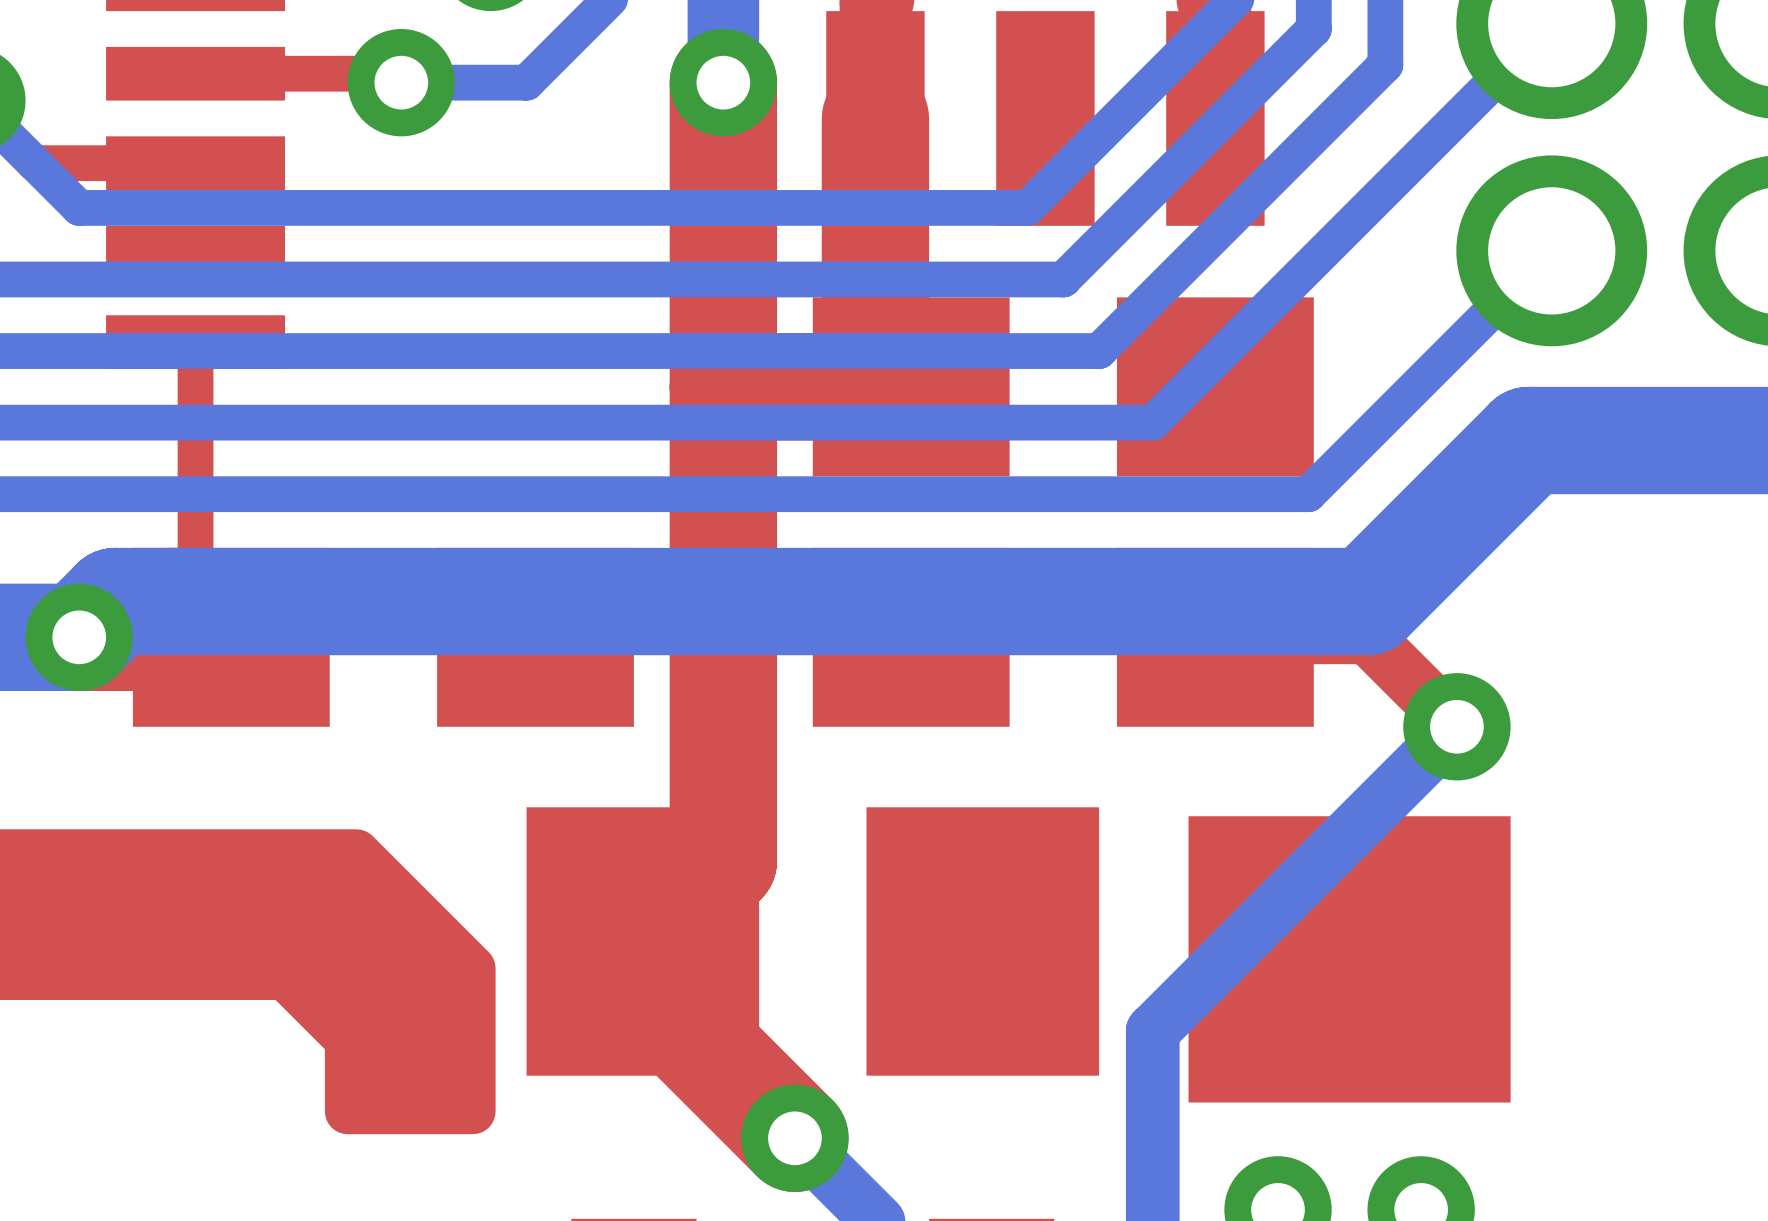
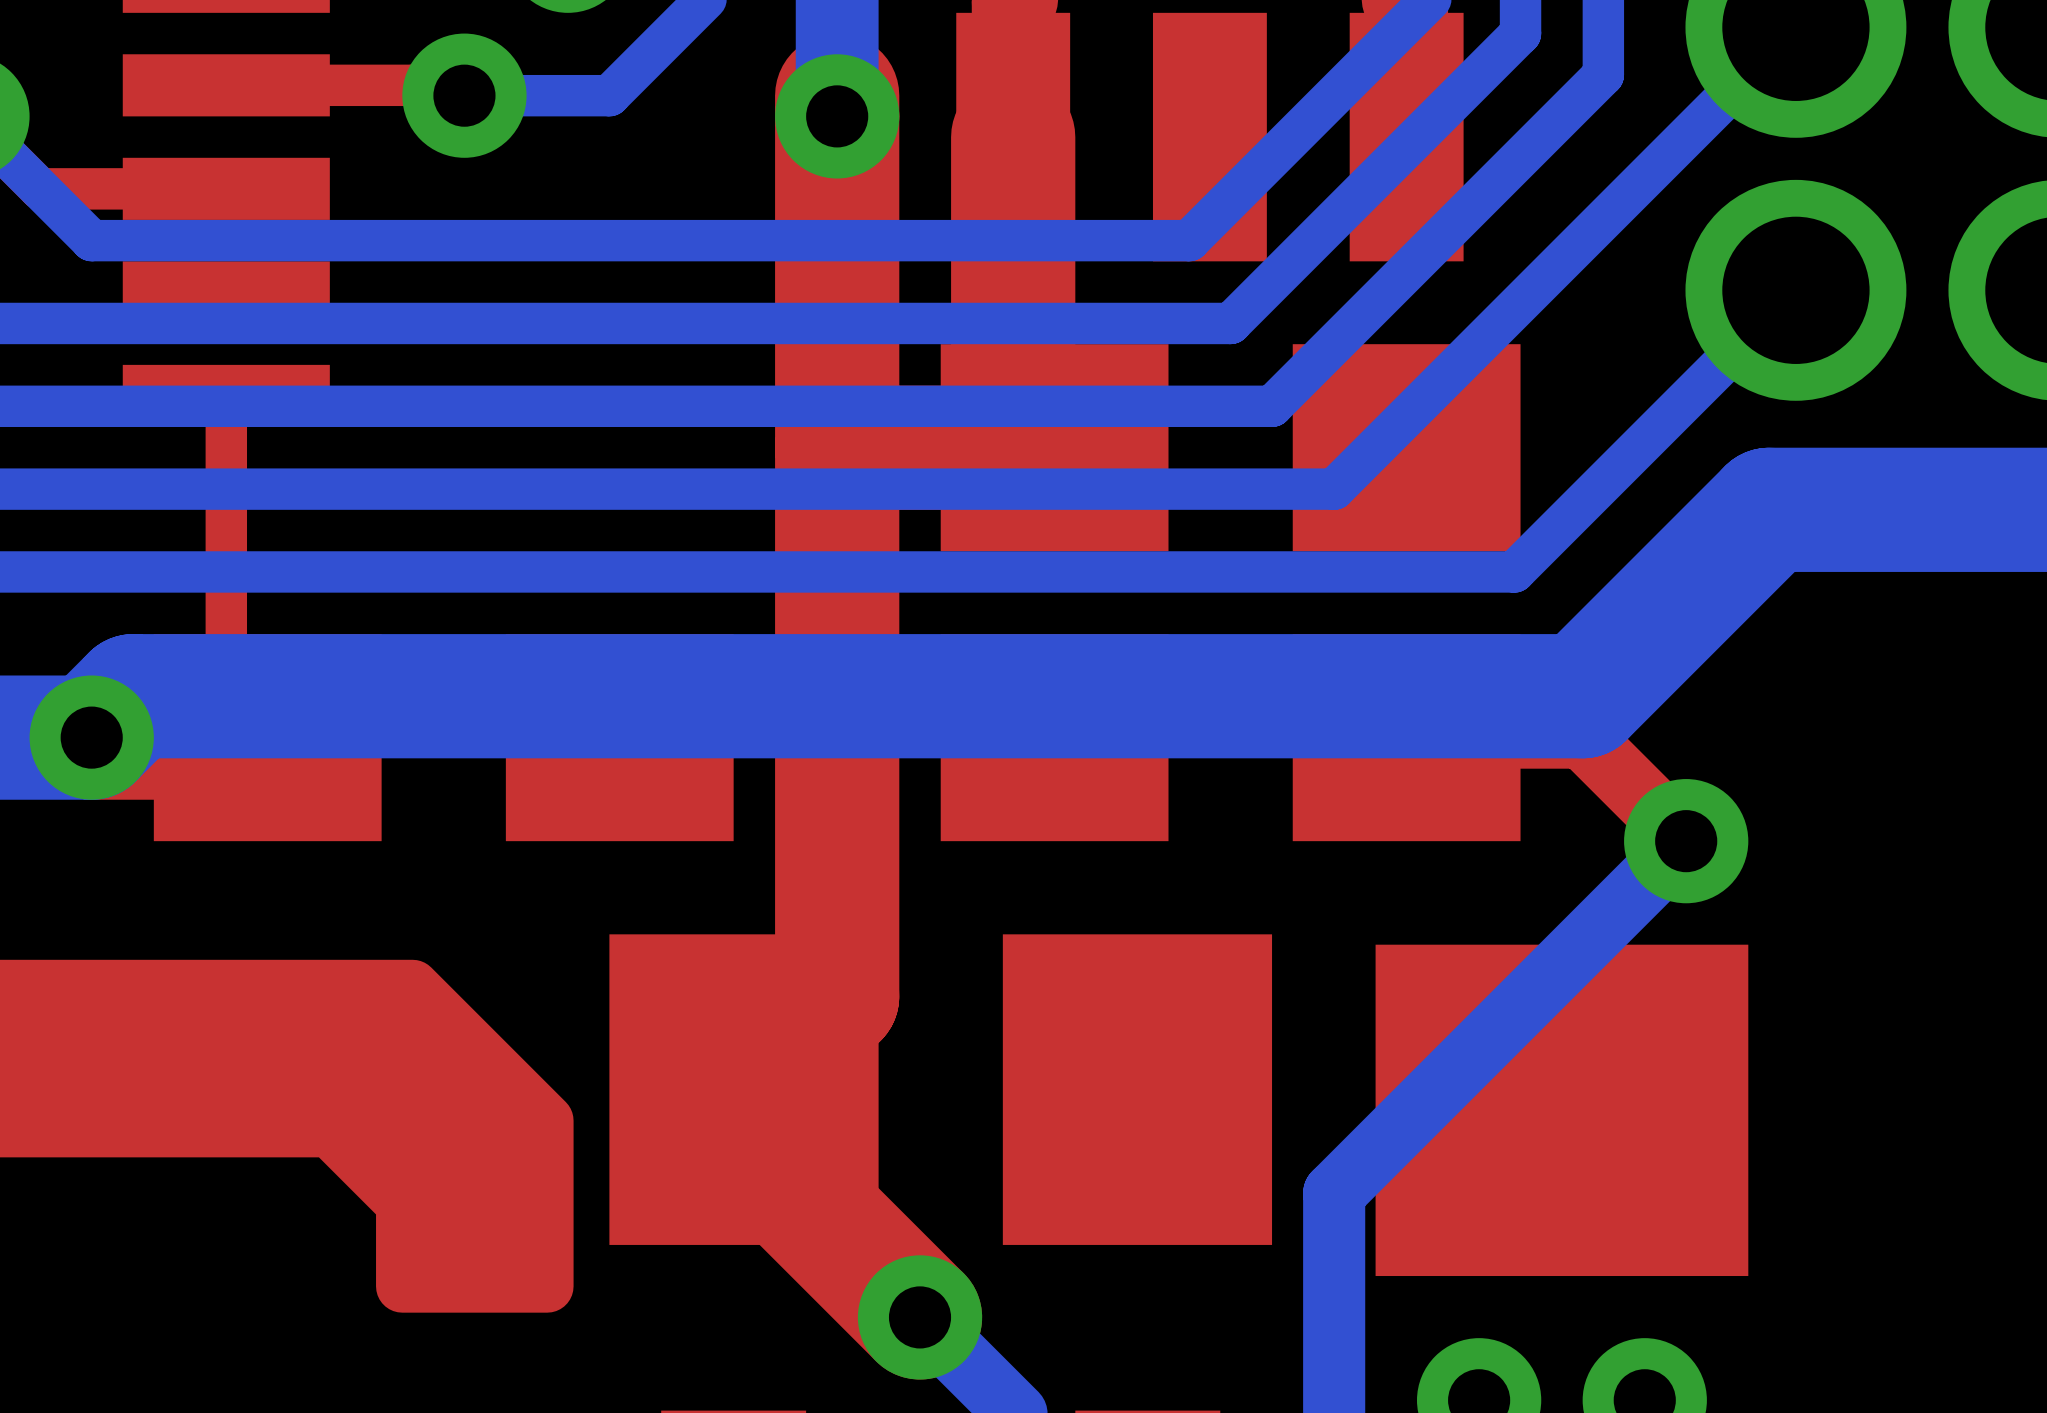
via position: (723, 82) -> (837, 116)

